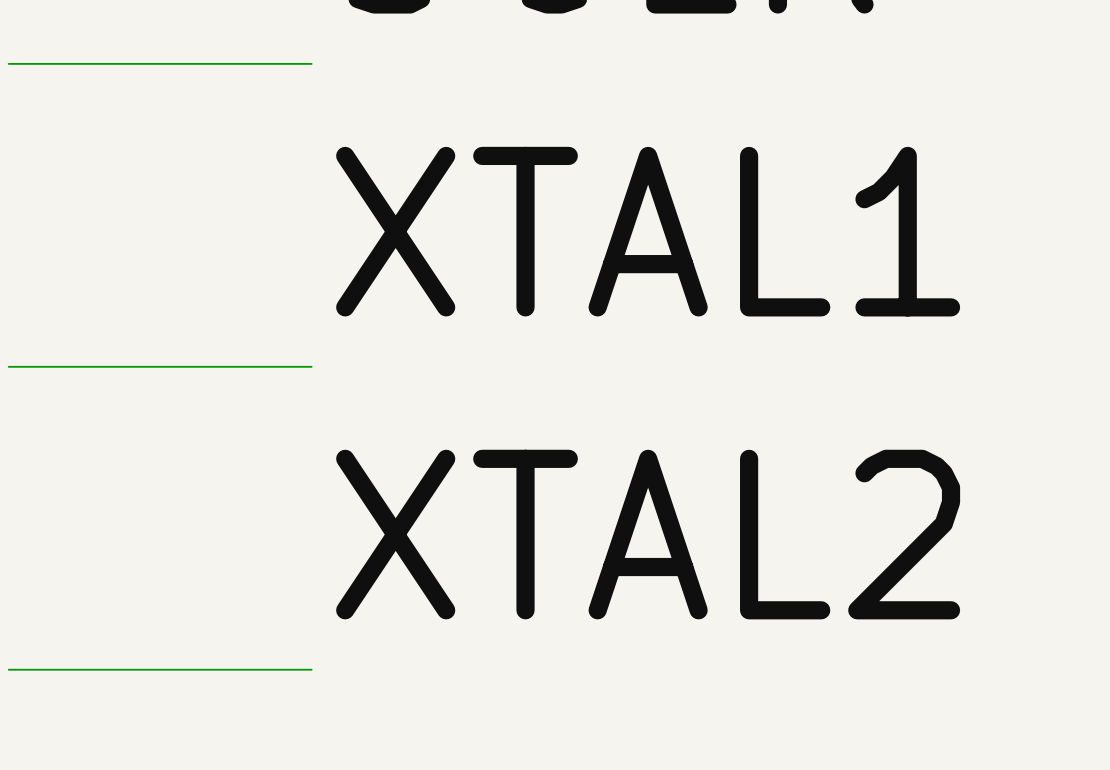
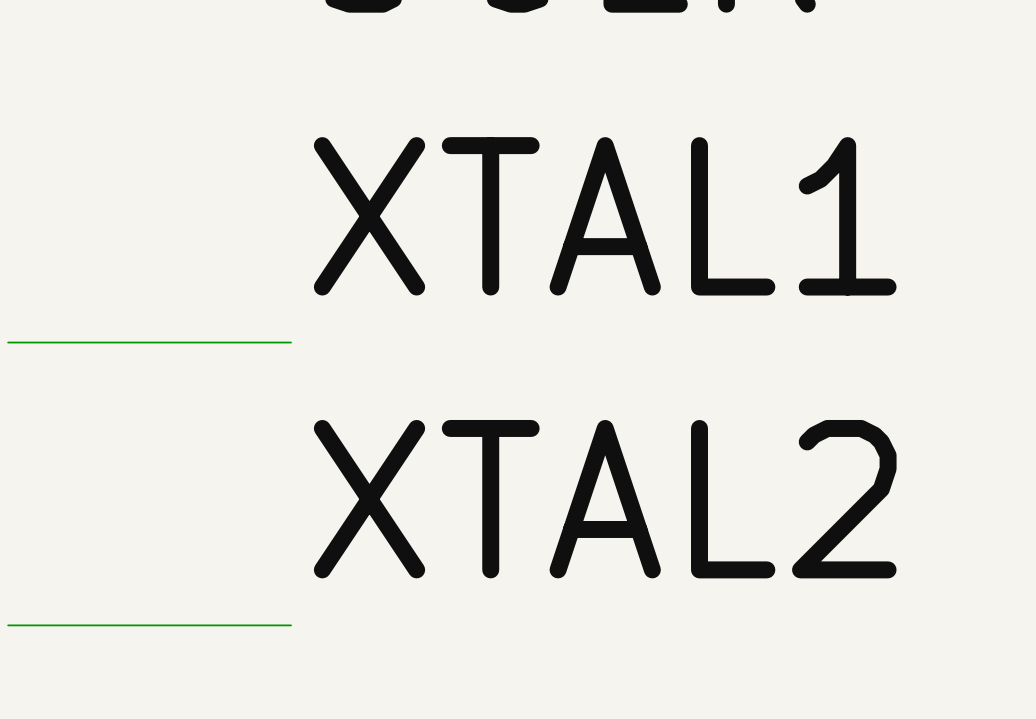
wire: (8, 63) (311, 63) -> none

